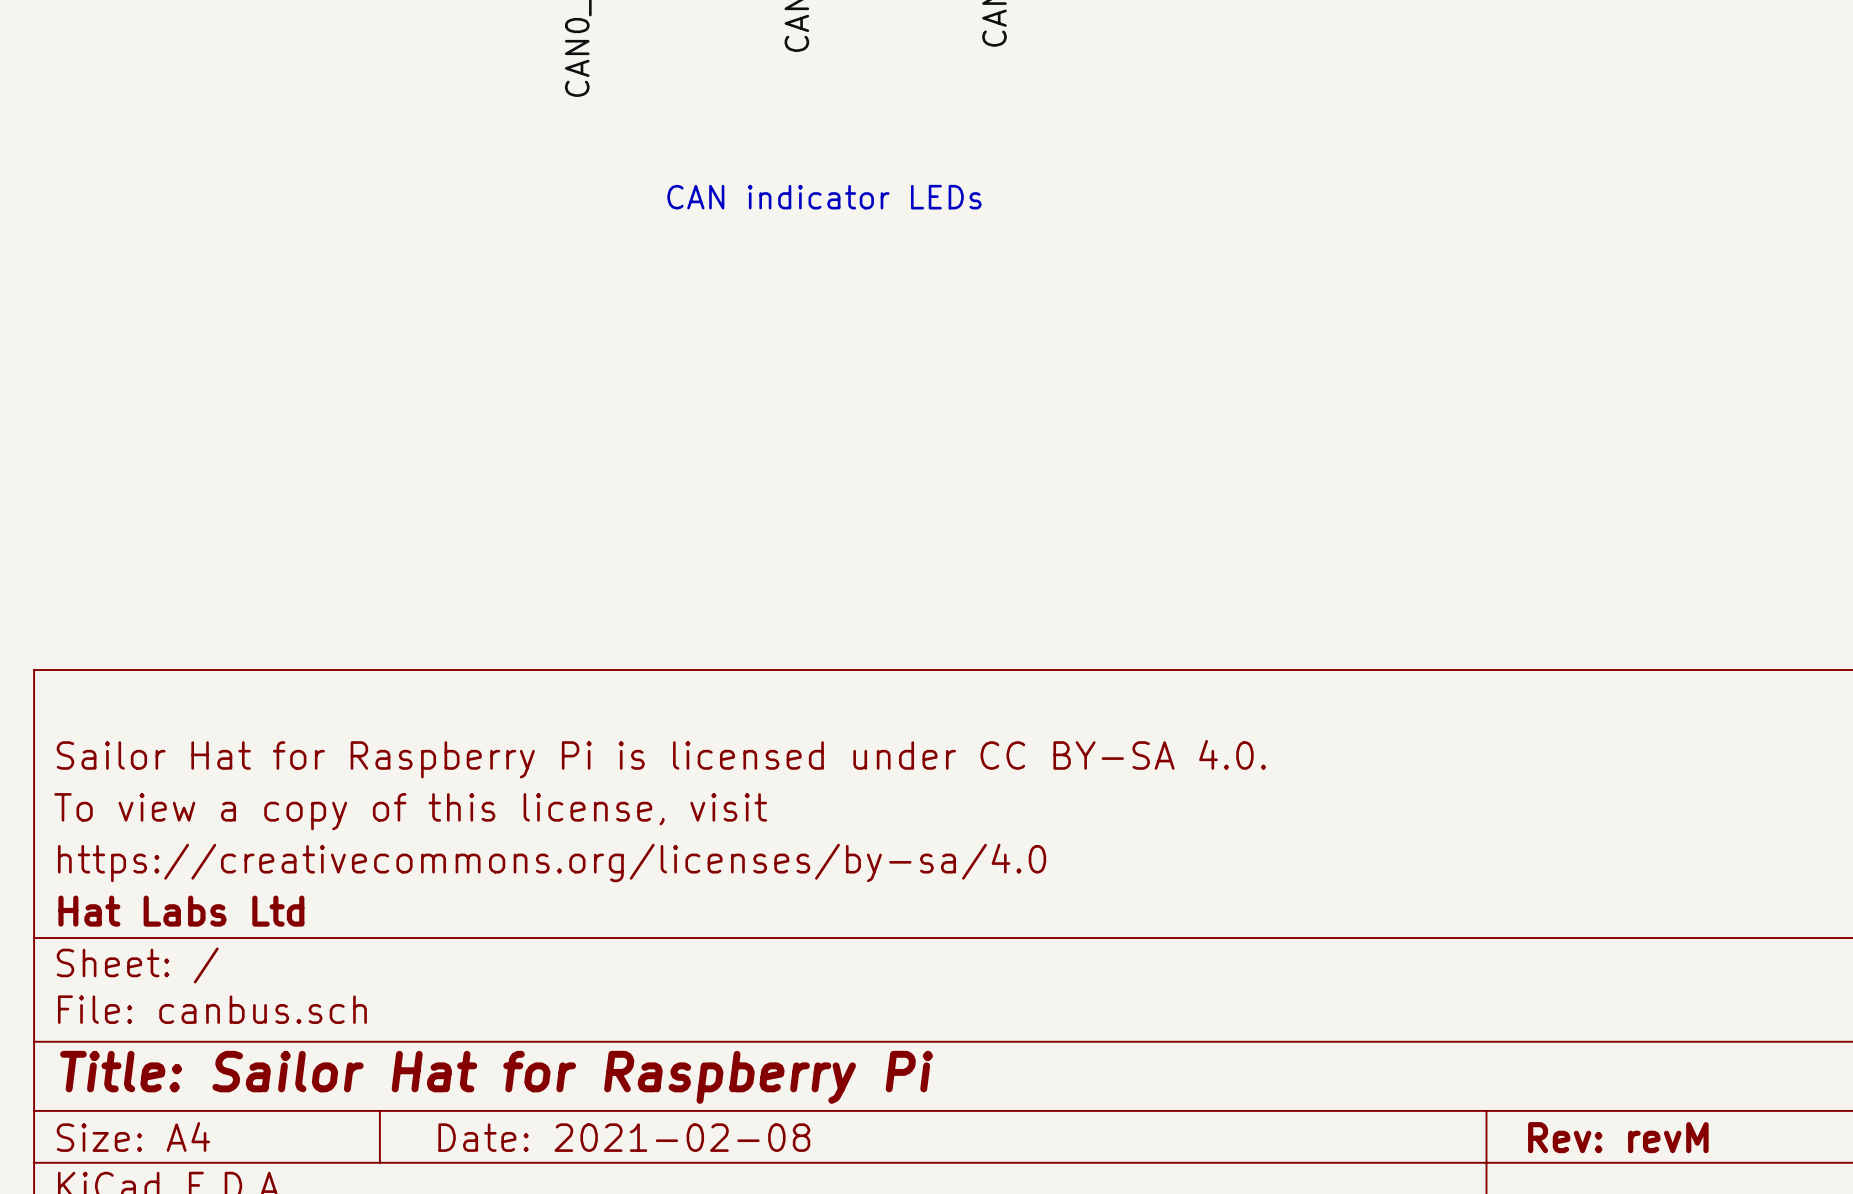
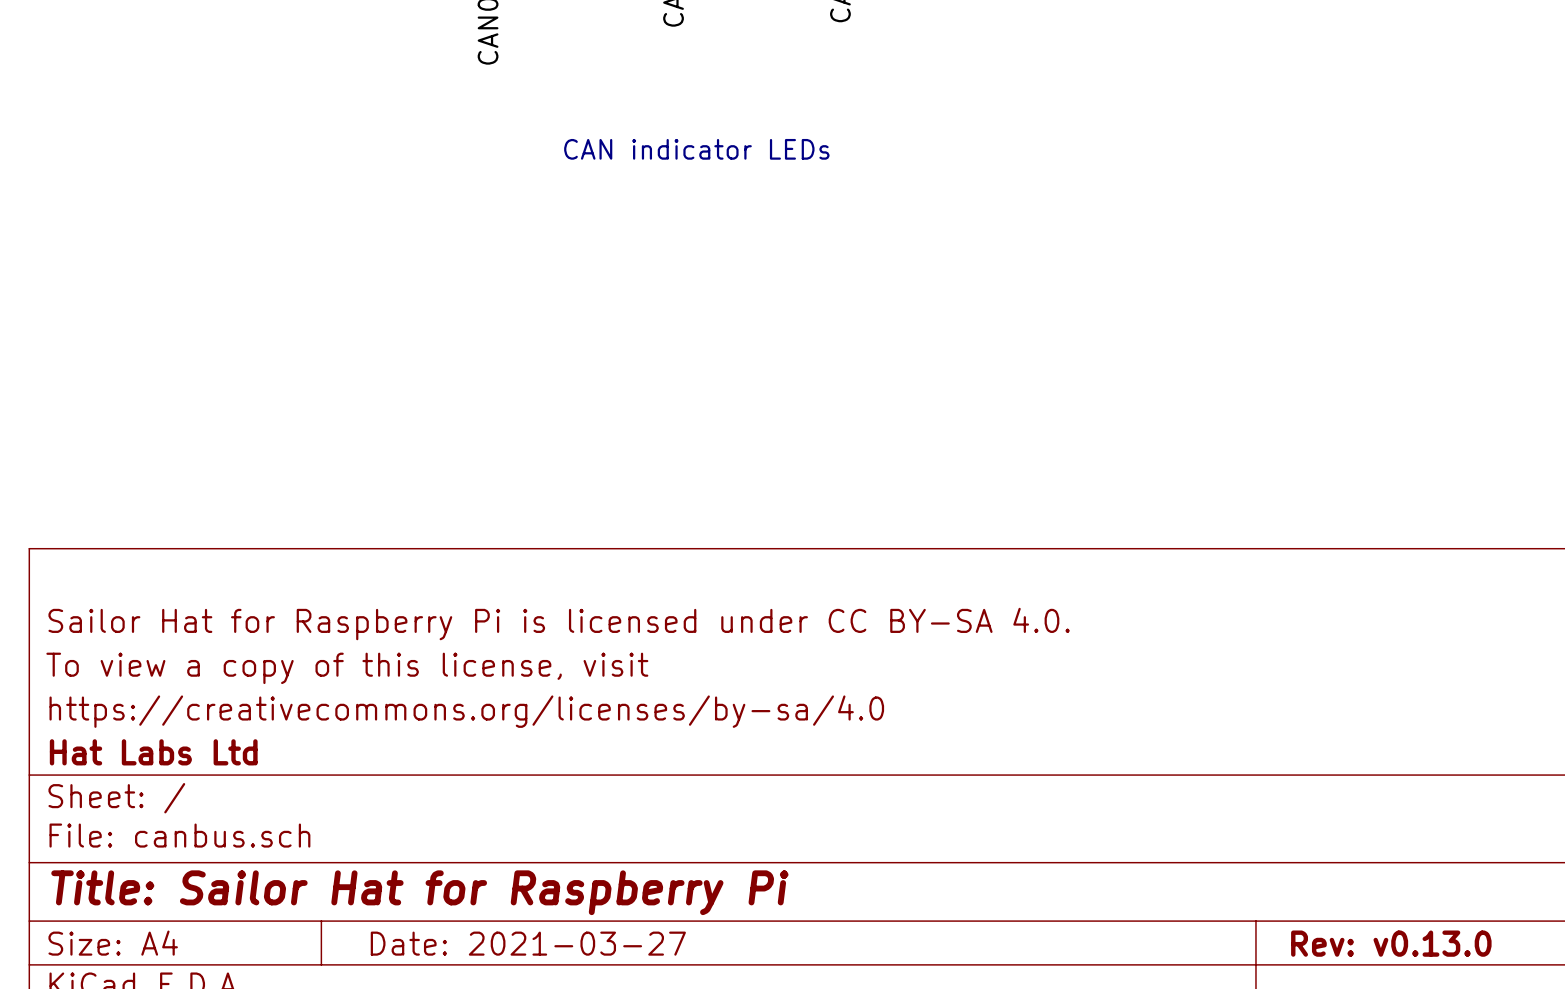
title block: Date: 2021-02-08 (624, 1137) -> Date: 2021-03-27 (528, 943)
title block: Rev: revM (1618, 1137) -> Rev: v0.13.0 (1391, 943)

